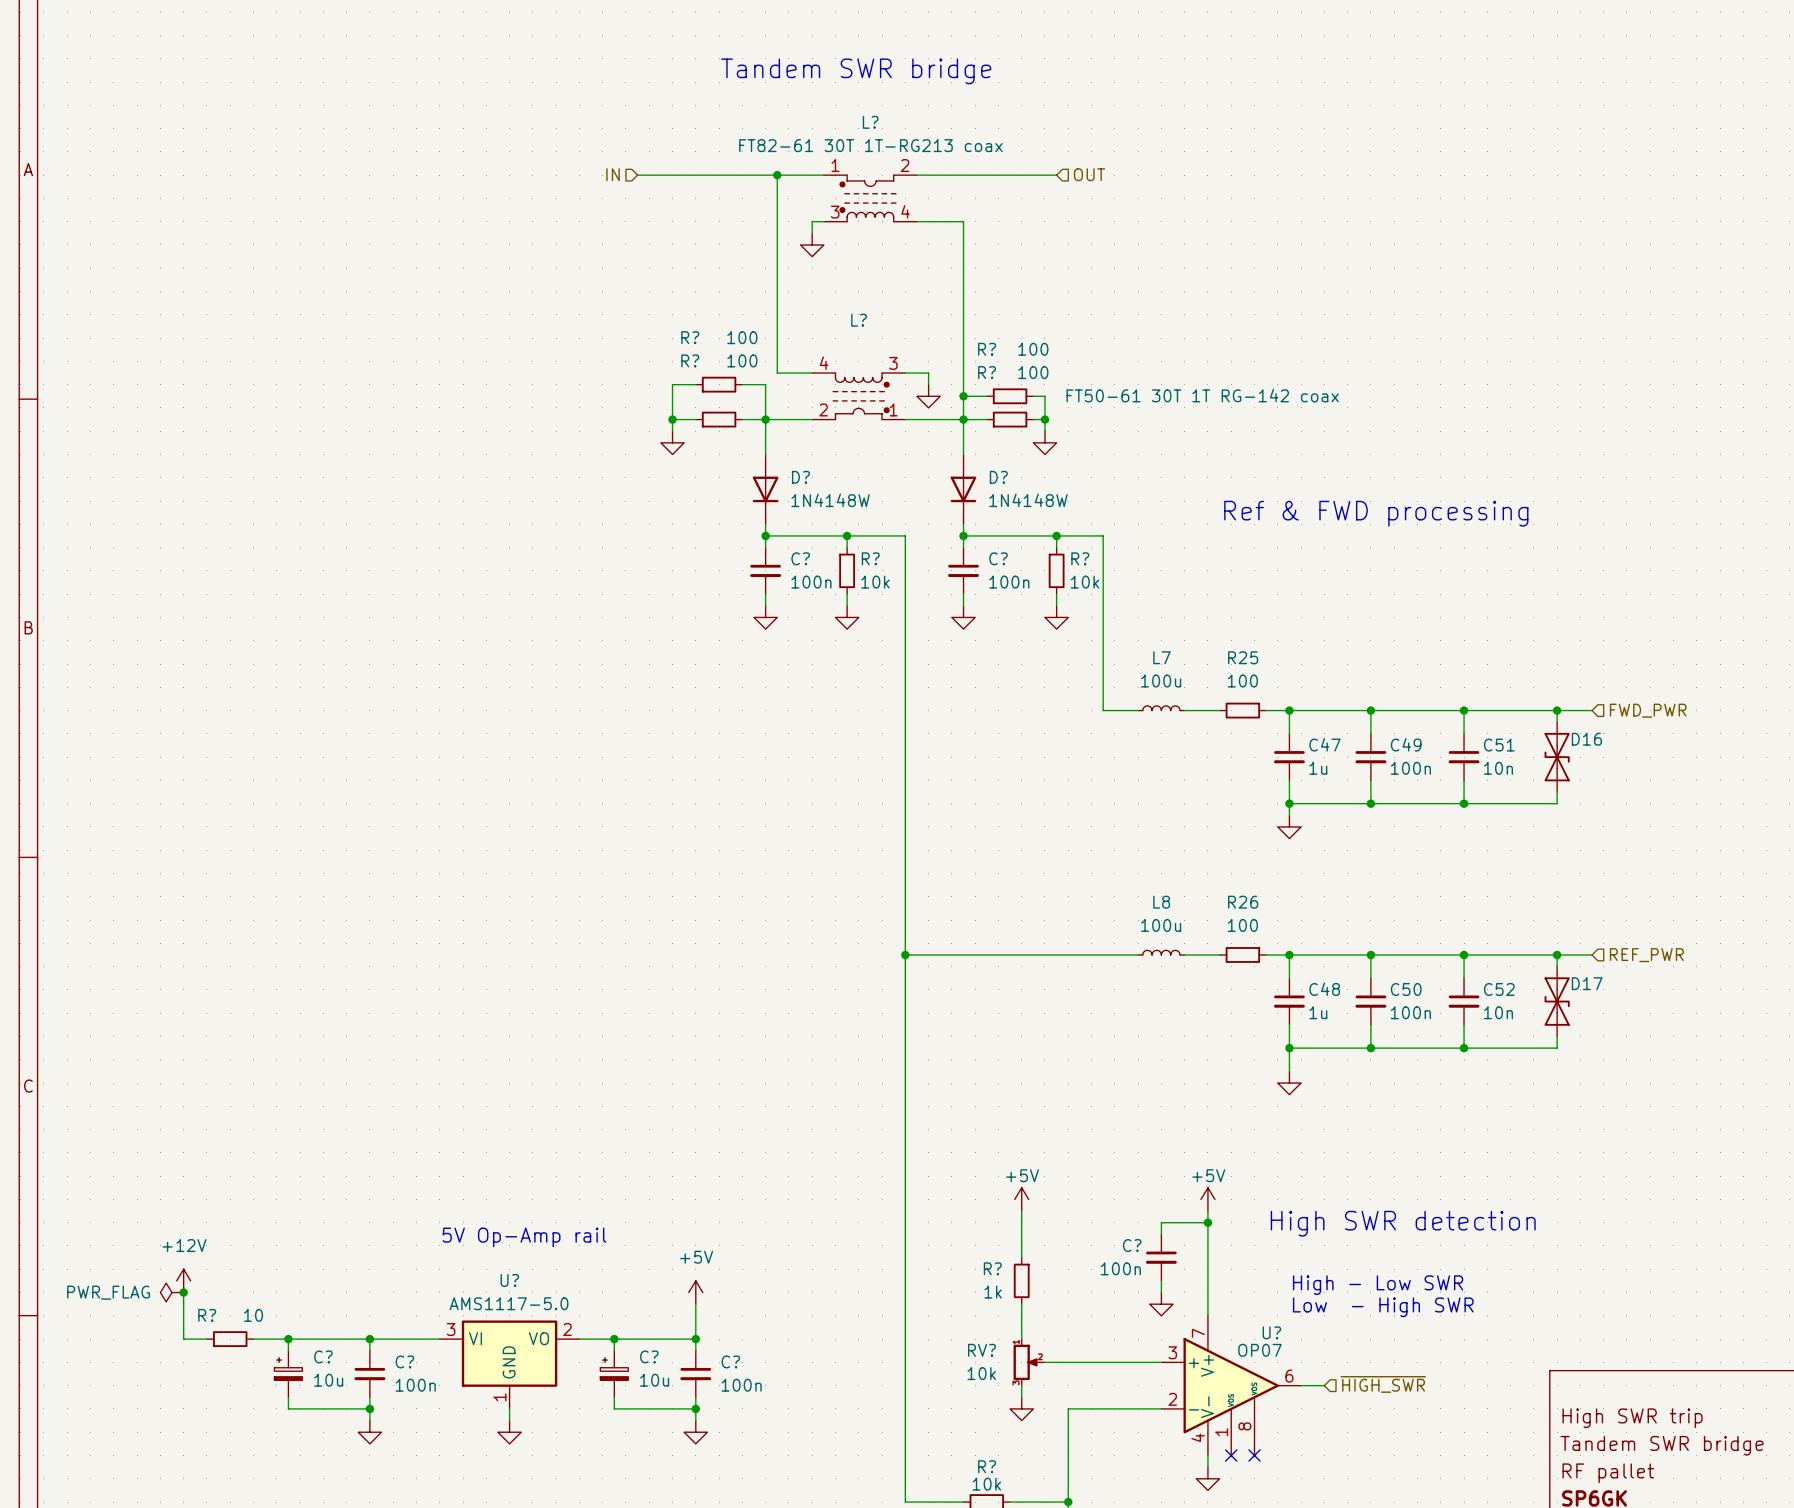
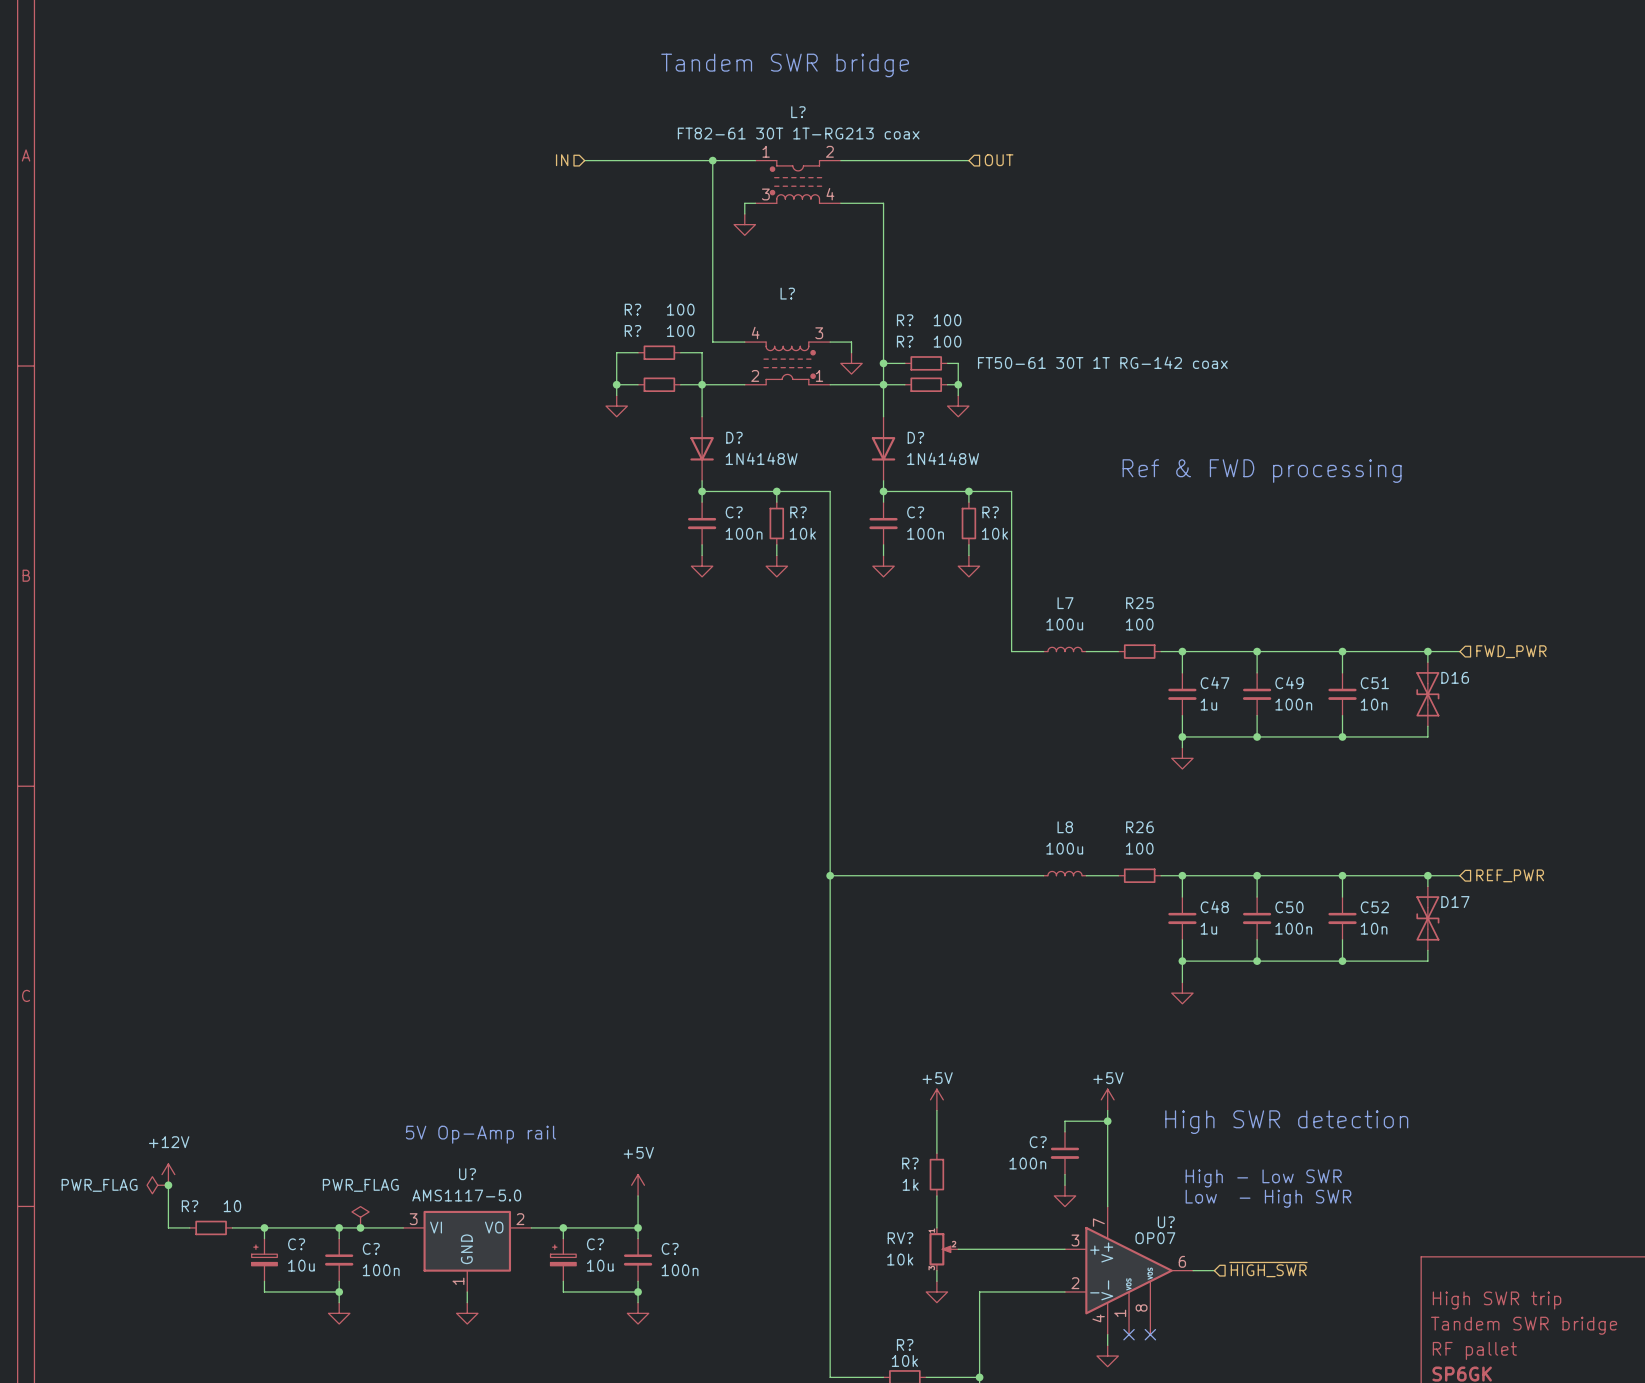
power symbol: none -> PWR_FLAG (360, 1217)
junction: none -> (360, 1227)

